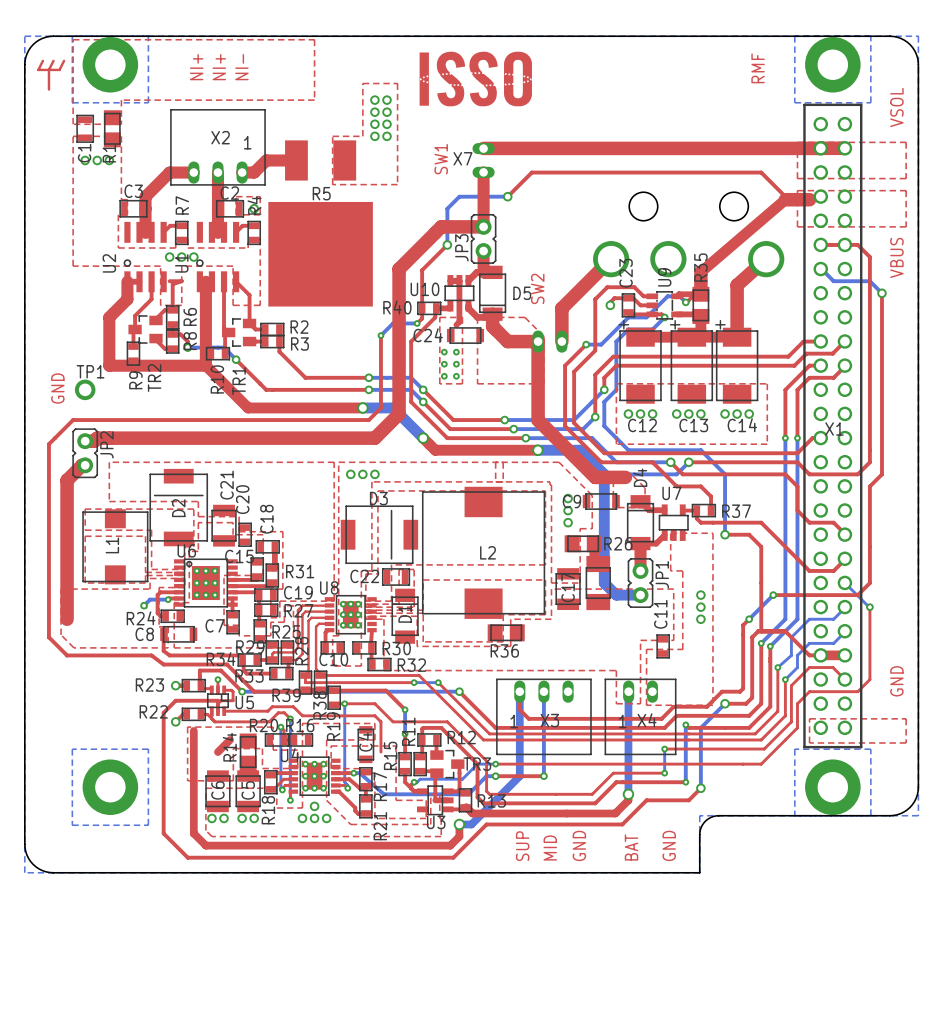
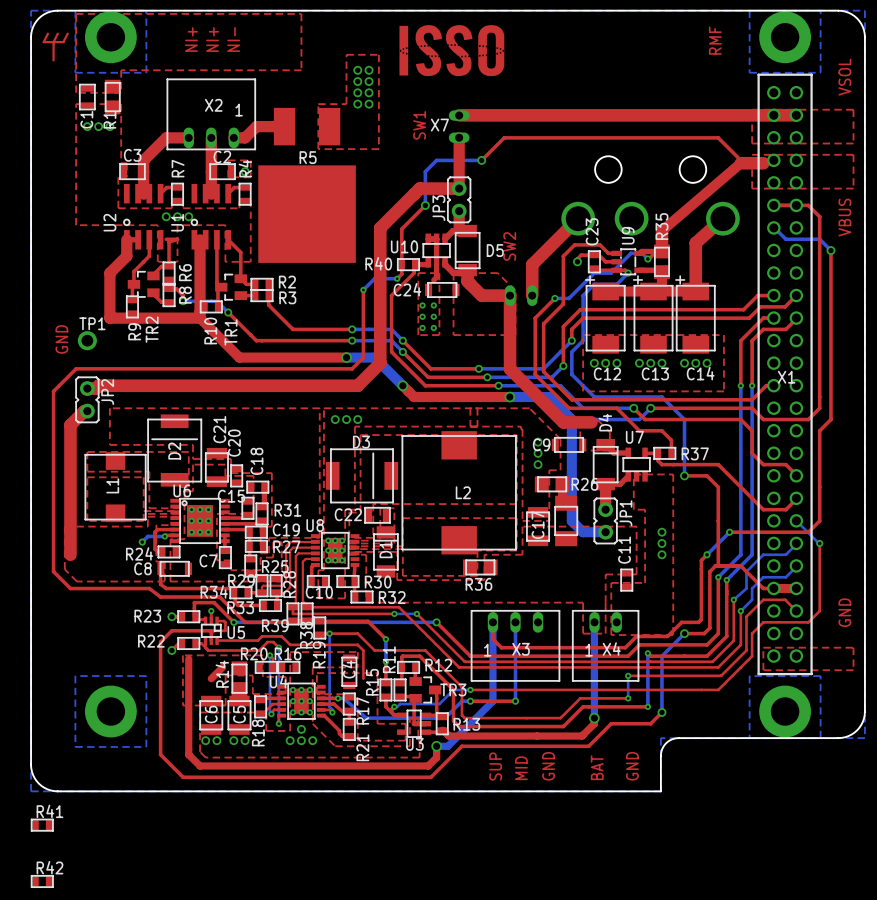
R41: none -> (42, 825)
R42: none -> (42, 881)

